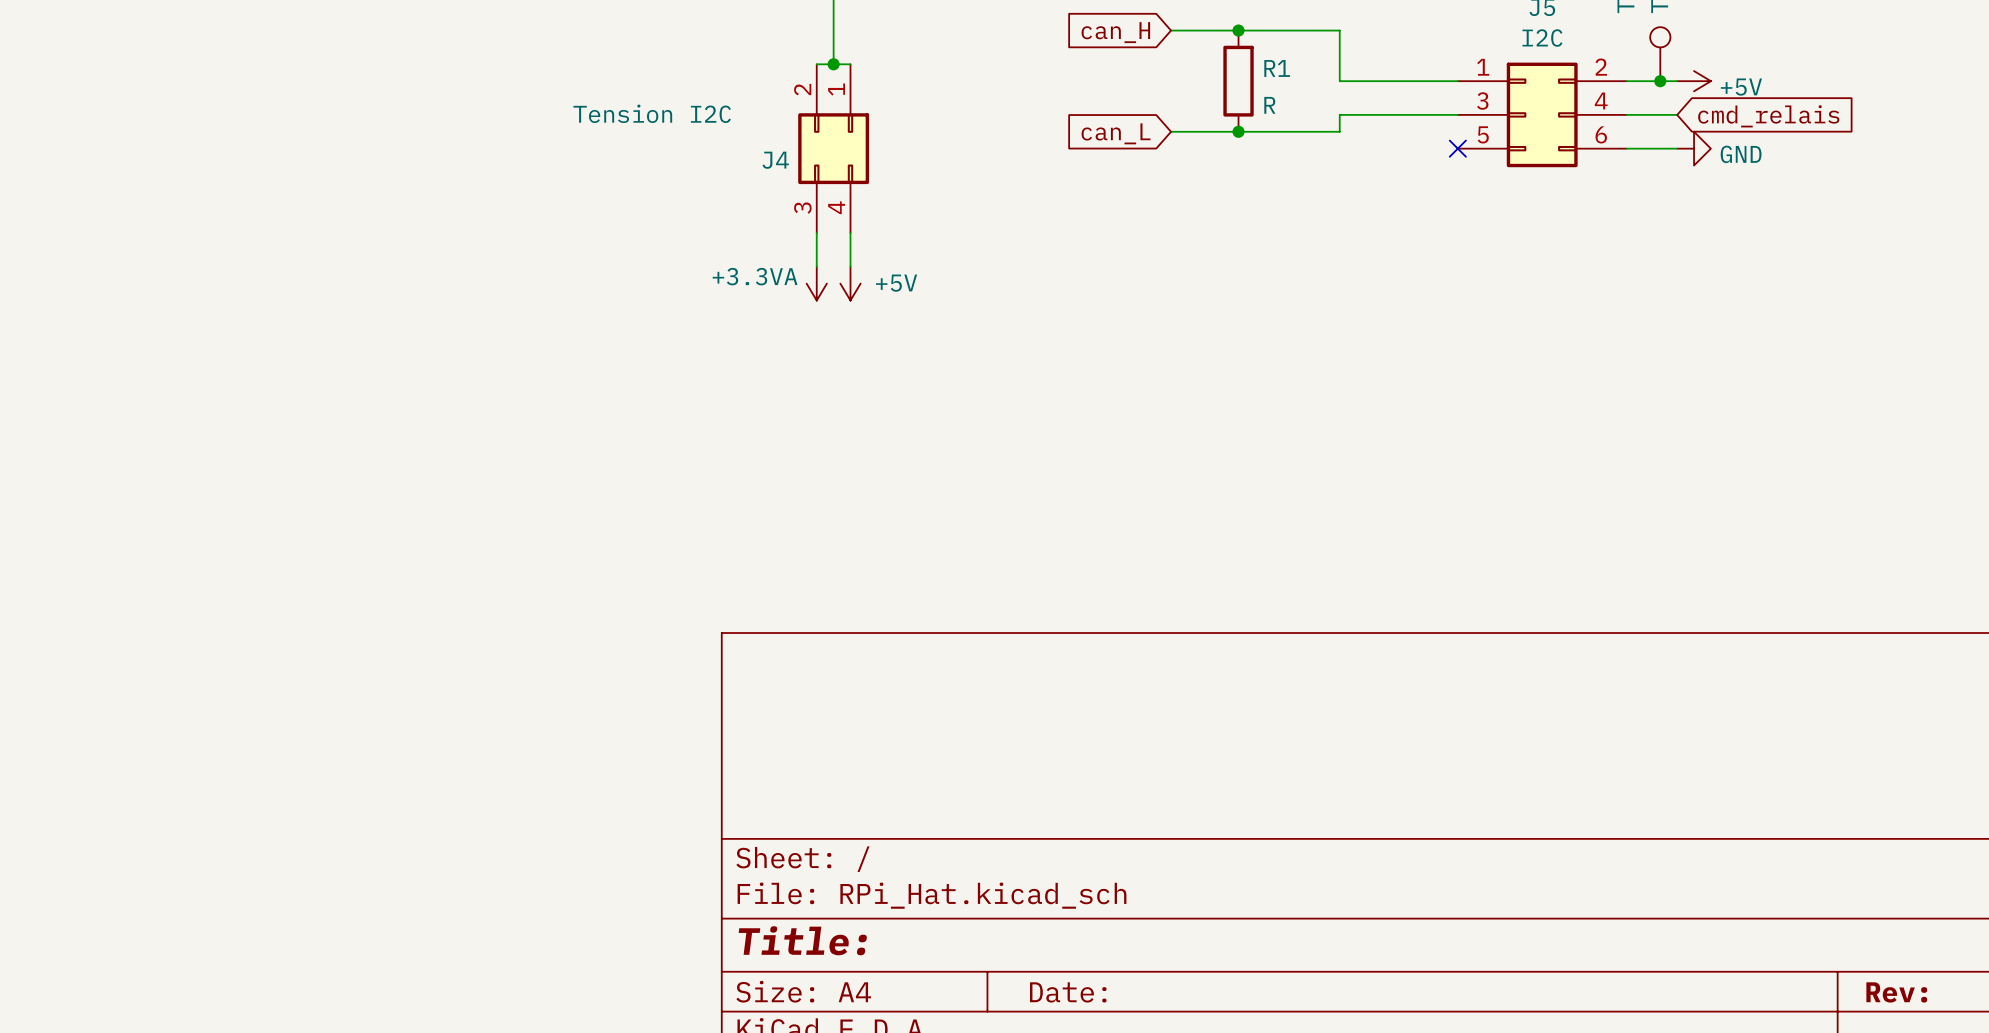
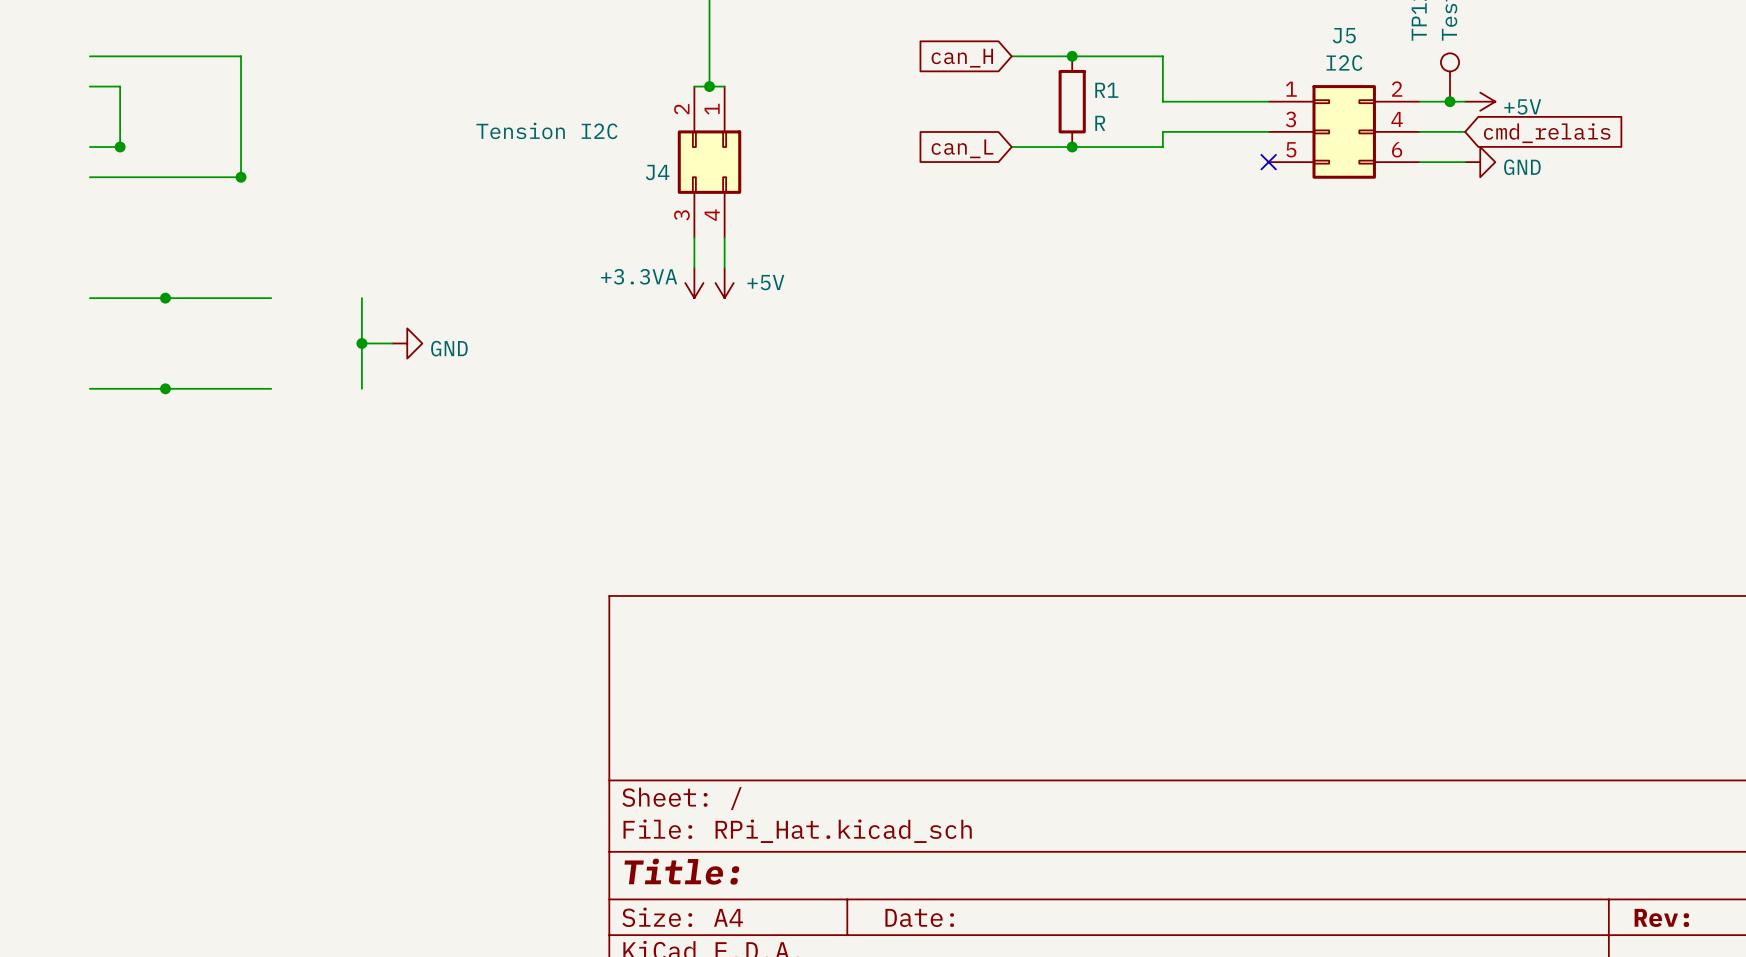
wire: none -> (89, 56) (241, 56) (241, 177) (89, 177)
wire: none -> (89, 86) (120, 86) (120, 147) (89, 147)
junction: none -> (120, 147)
junction: none -> (241, 177)
wire: none -> (89, 298) (271, 298)
junction: none -> (165, 298)
wire: none -> (361, 298) (361, 388)
wire: none -> (361, 343) (392, 343)
junction: none -> (361, 343)
power symbol: none -> GND (407, 343)
wire: none -> (89, 388) (271, 388)
junction: none -> (165, 388)

